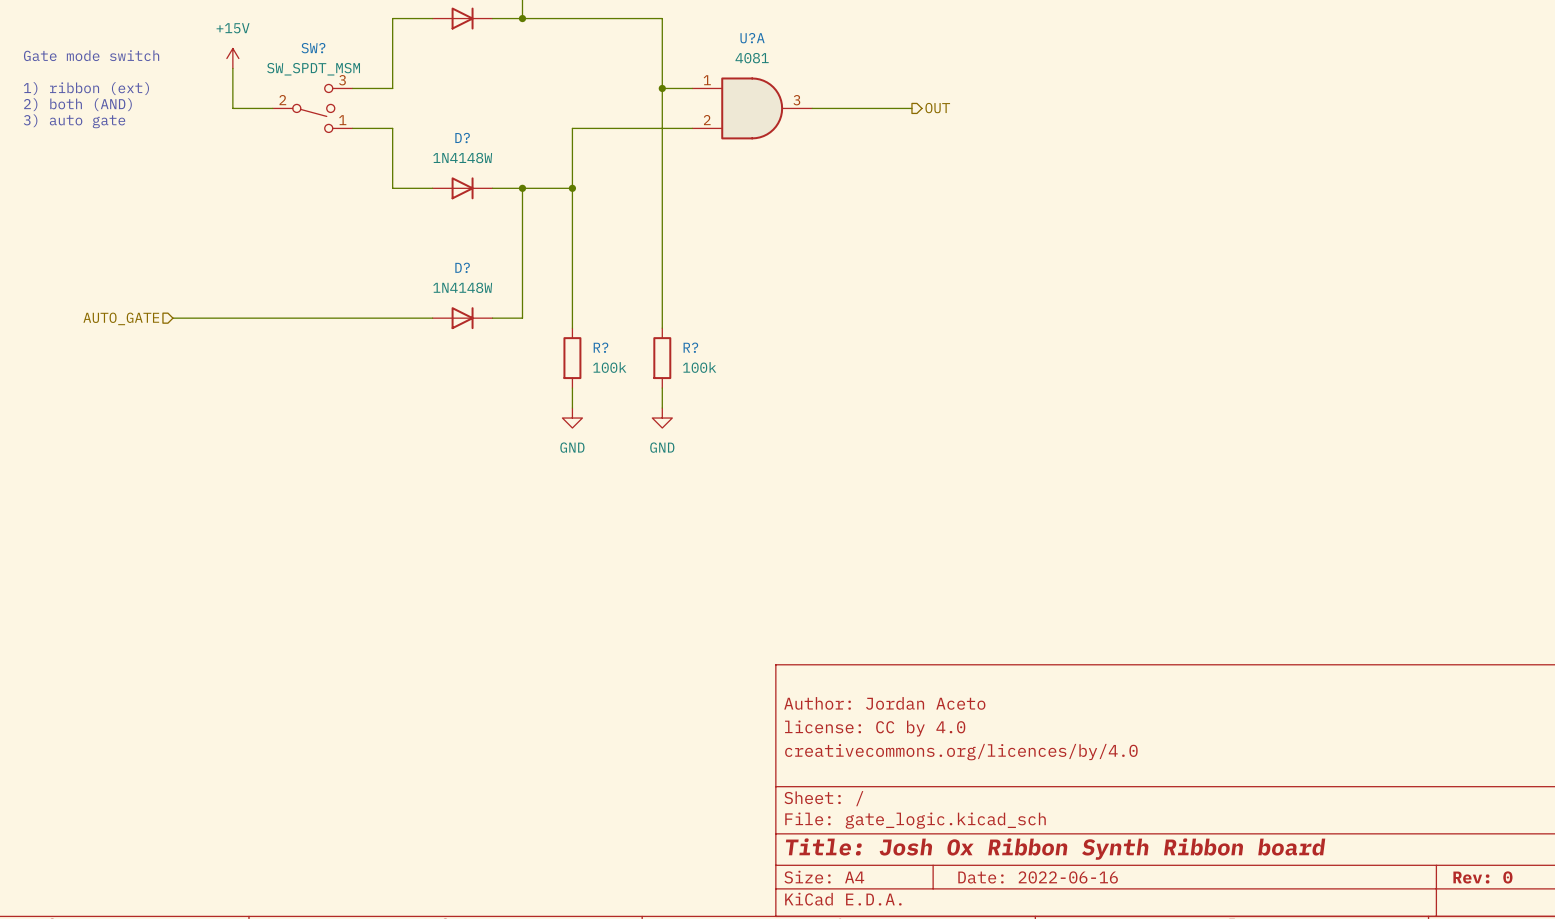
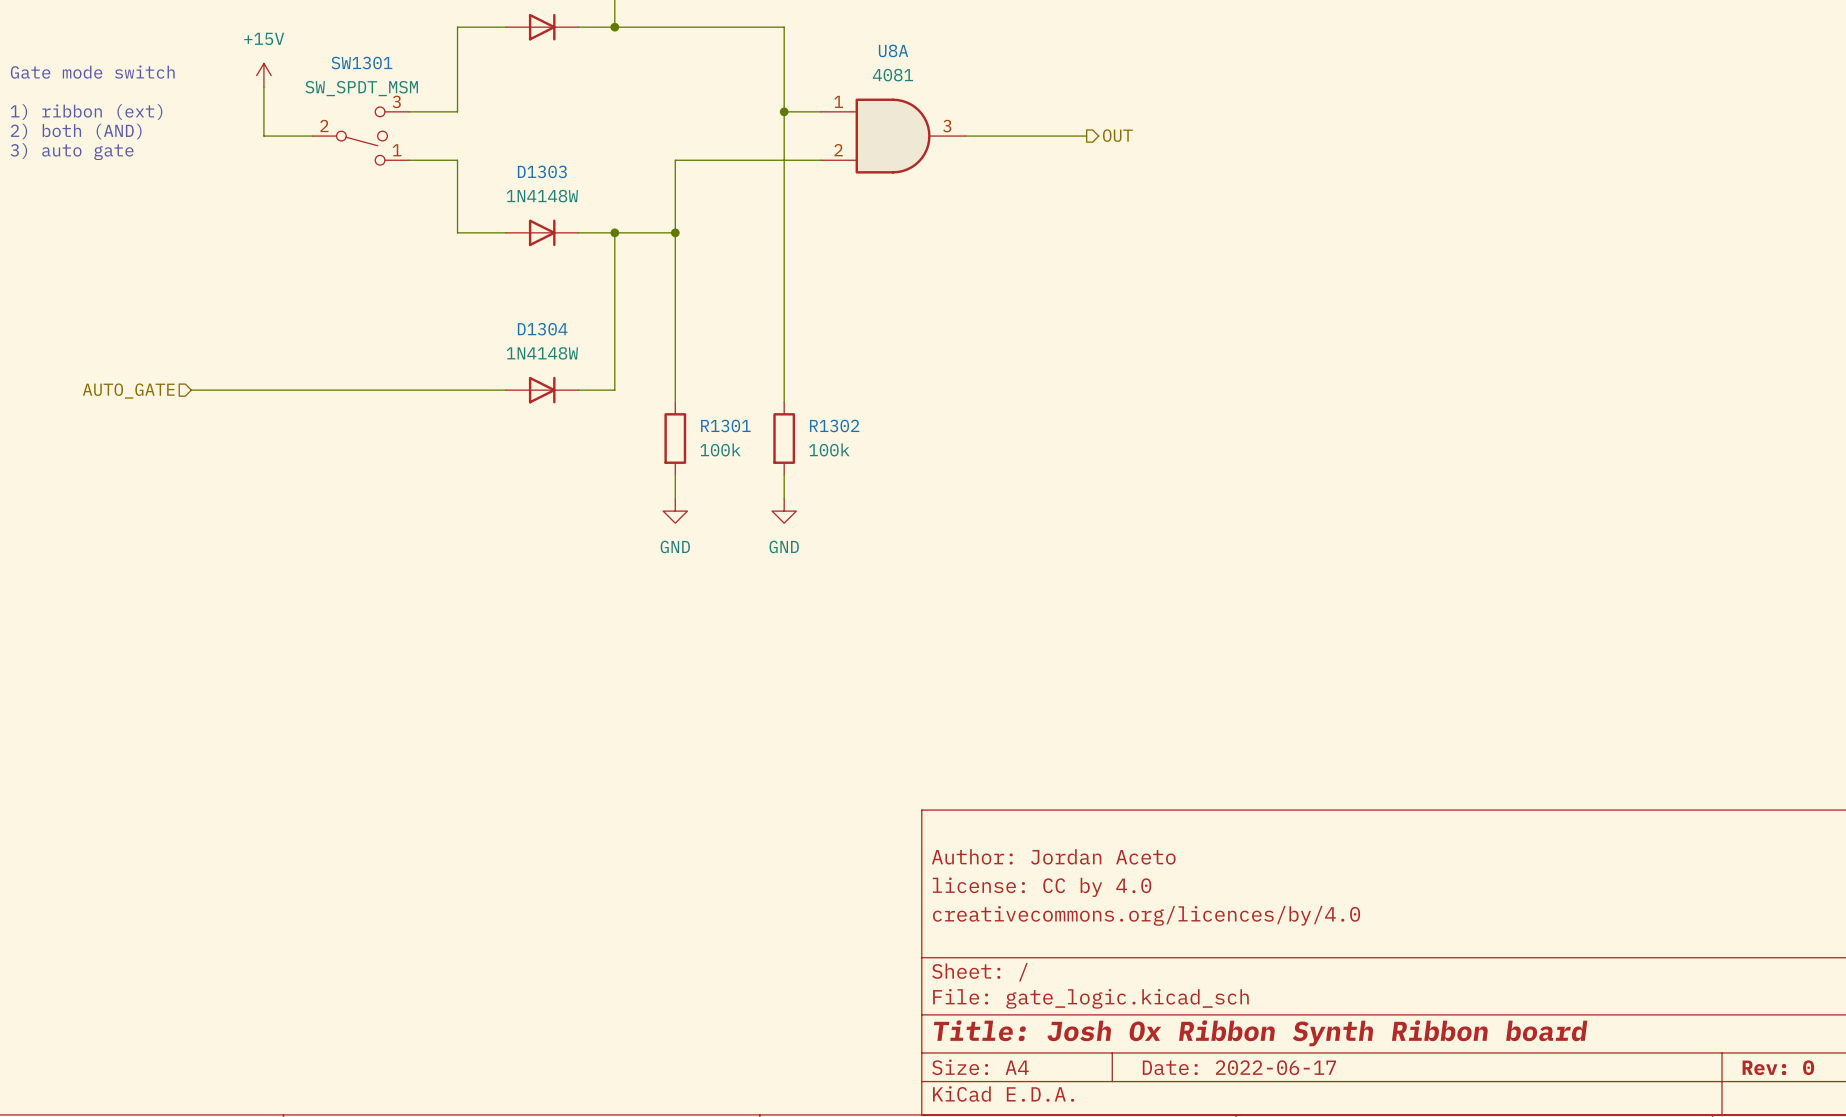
U?A name: U?A (752, 38) -> U8A (893, 50)
SW? name: SW? (313, 48) -> SW1301 (361, 63)
D? name: D? (462, 138) -> D1303 (542, 171)
D? name: D? (462, 267) -> D1304 (542, 329)
R? name: R? (600, 347) -> R1301 (725, 425)
R? name: R? (690, 347) -> R1302 (834, 425)
title block: Date: 2022-06-16 (1038, 877) -> Date: 2022-06-17 (1239, 1067)

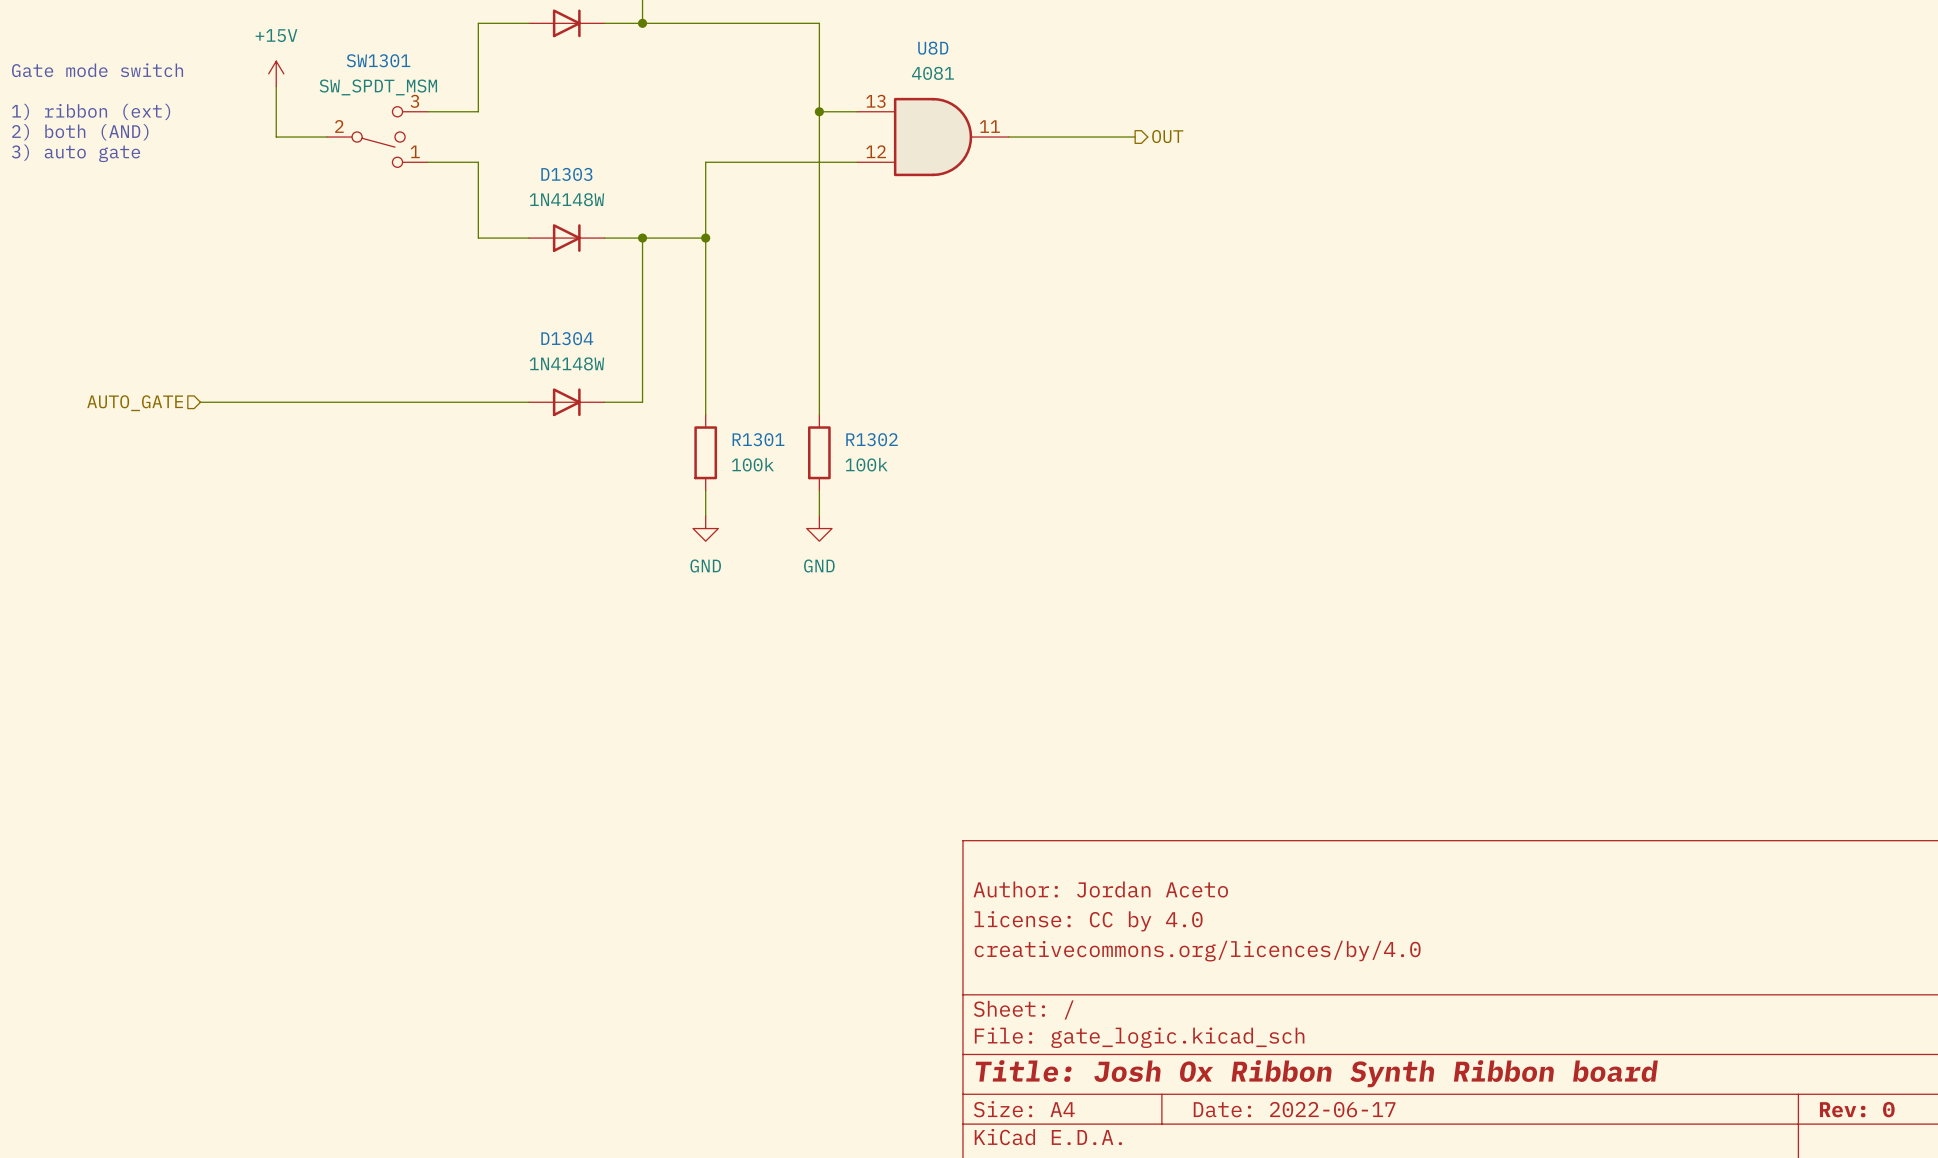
U8A name: U8A (893, 50) -> U8D (933, 48)
U8A pin number: 1 (838, 101) -> 13 (875, 101)
U8A pin number: 3 (947, 126) -> 11 (989, 126)
U8A pin number: 2 (838, 150) -> 12 (876, 151)

